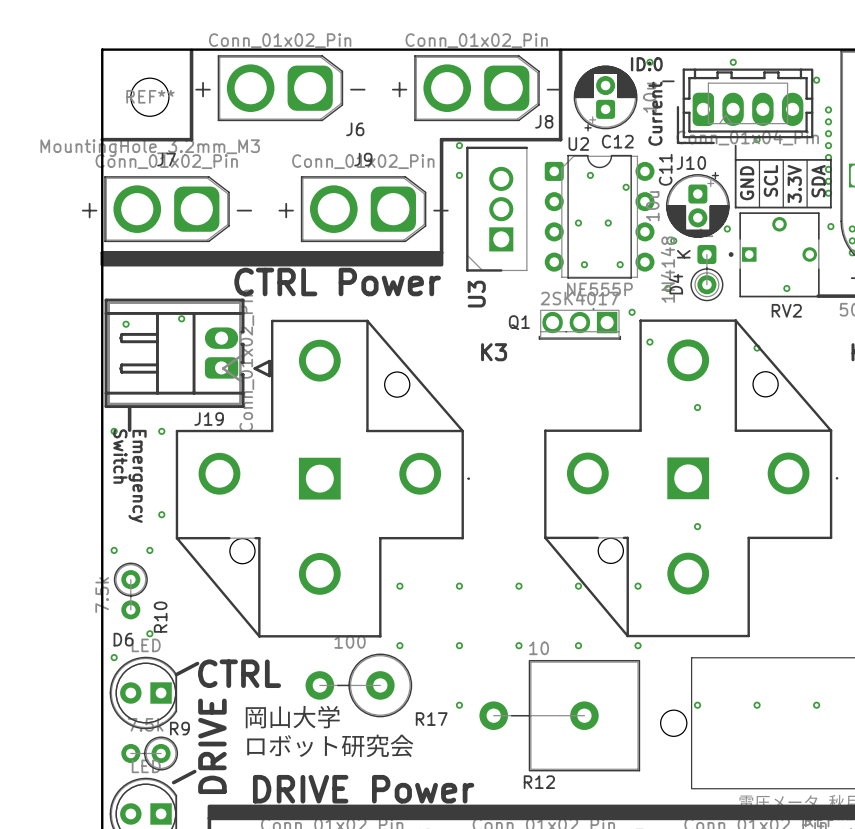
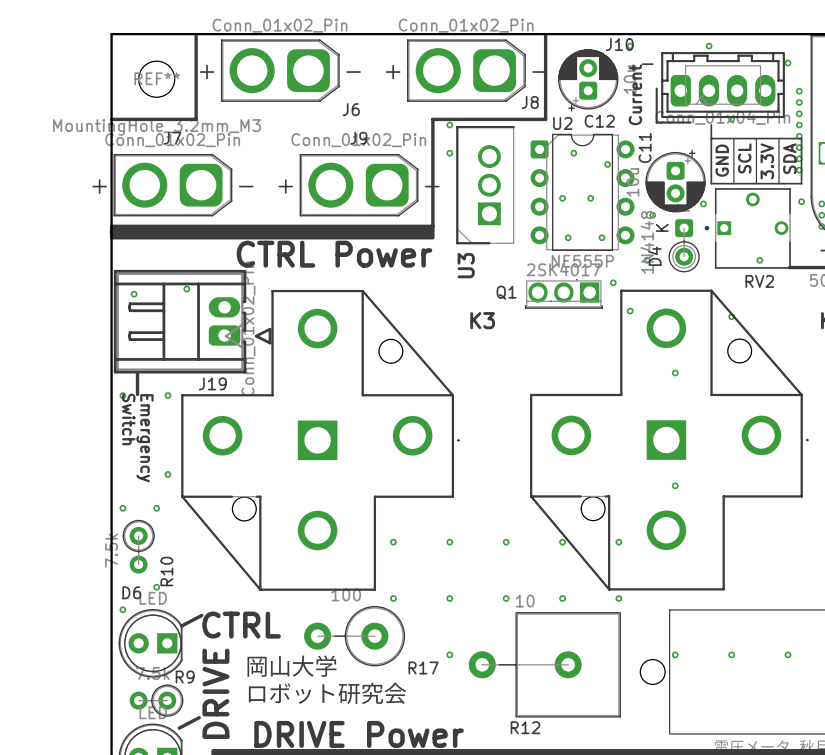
text: ID:0 (646, 64) -> none
J10 name position: J10 (691, 163) -> J10 (619, 44)

